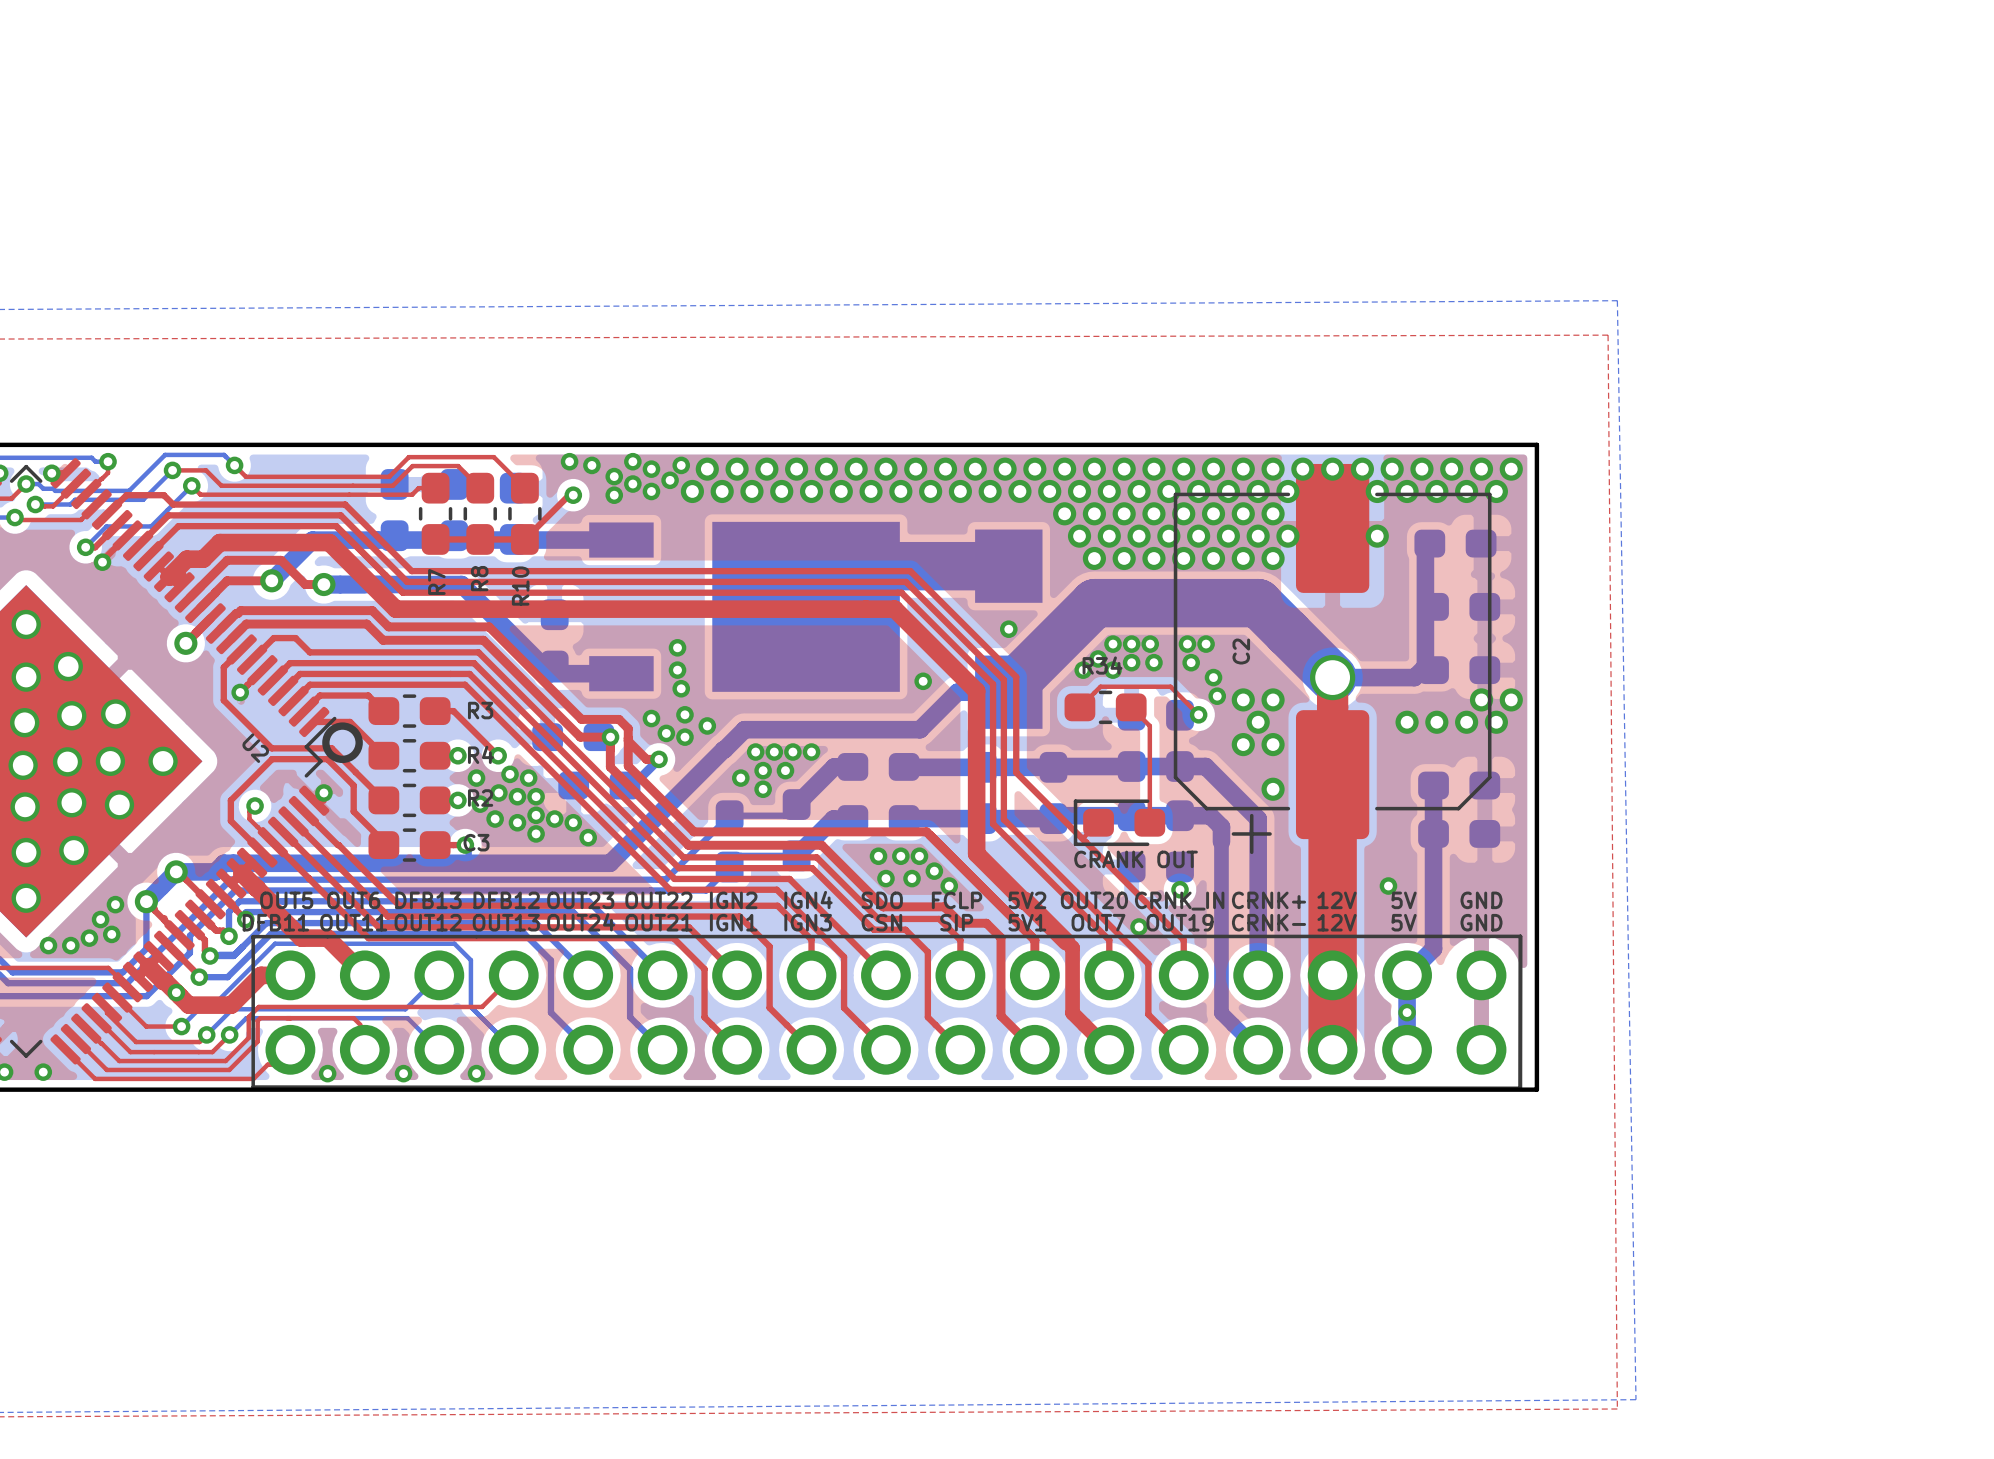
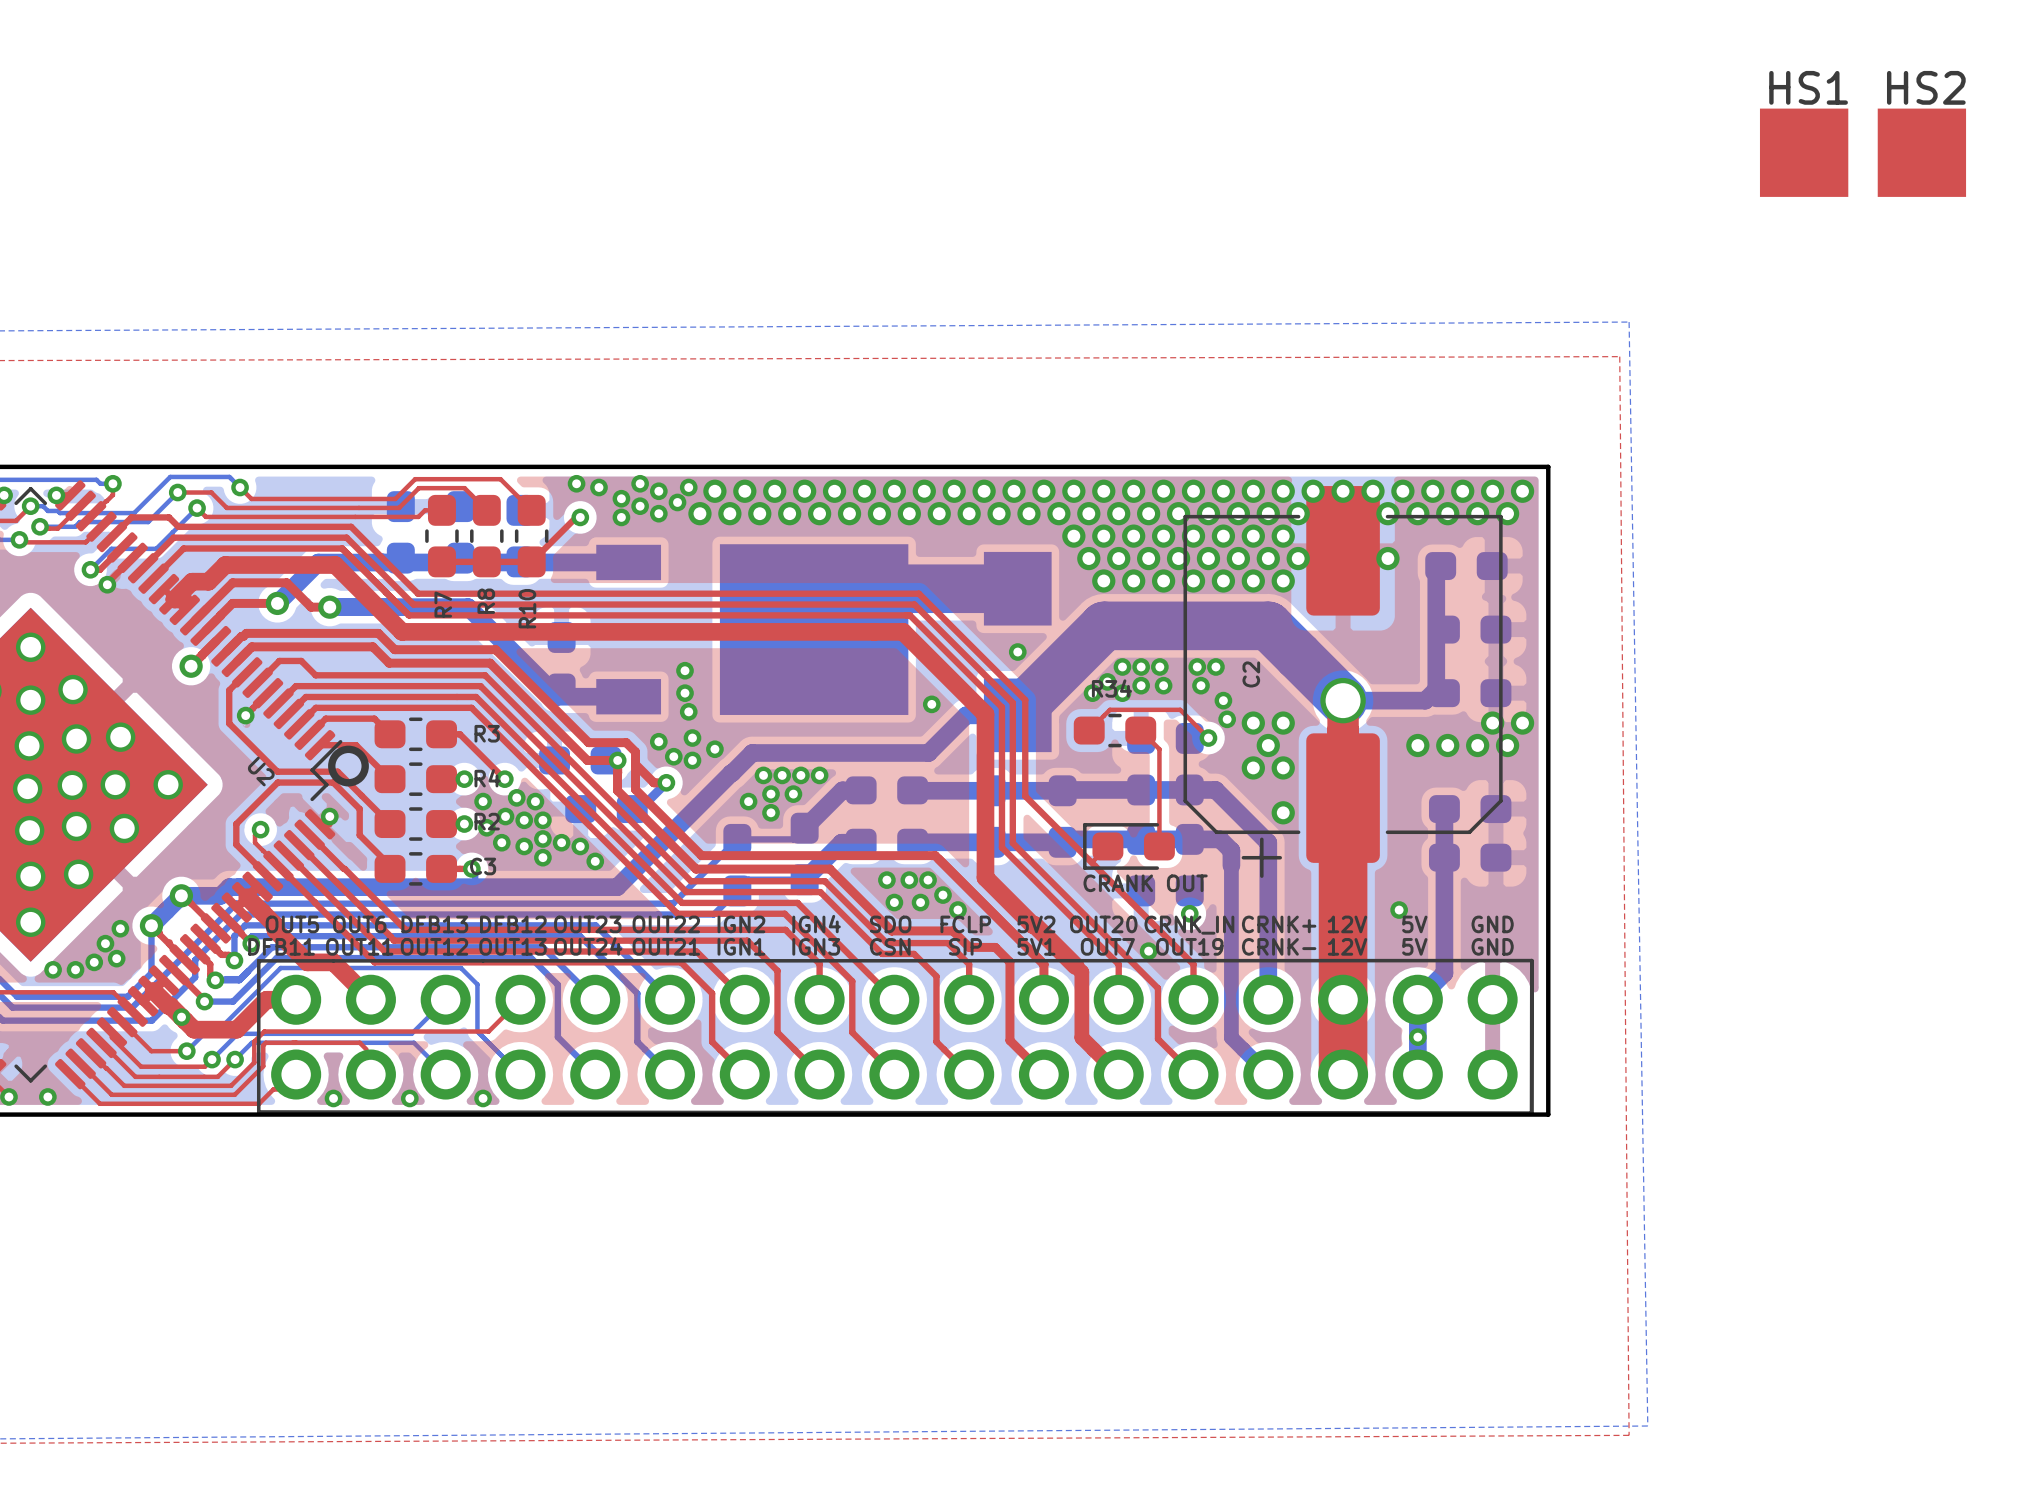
HS1: none -> (1804, 152)
HS2: none -> (1921, 152)

